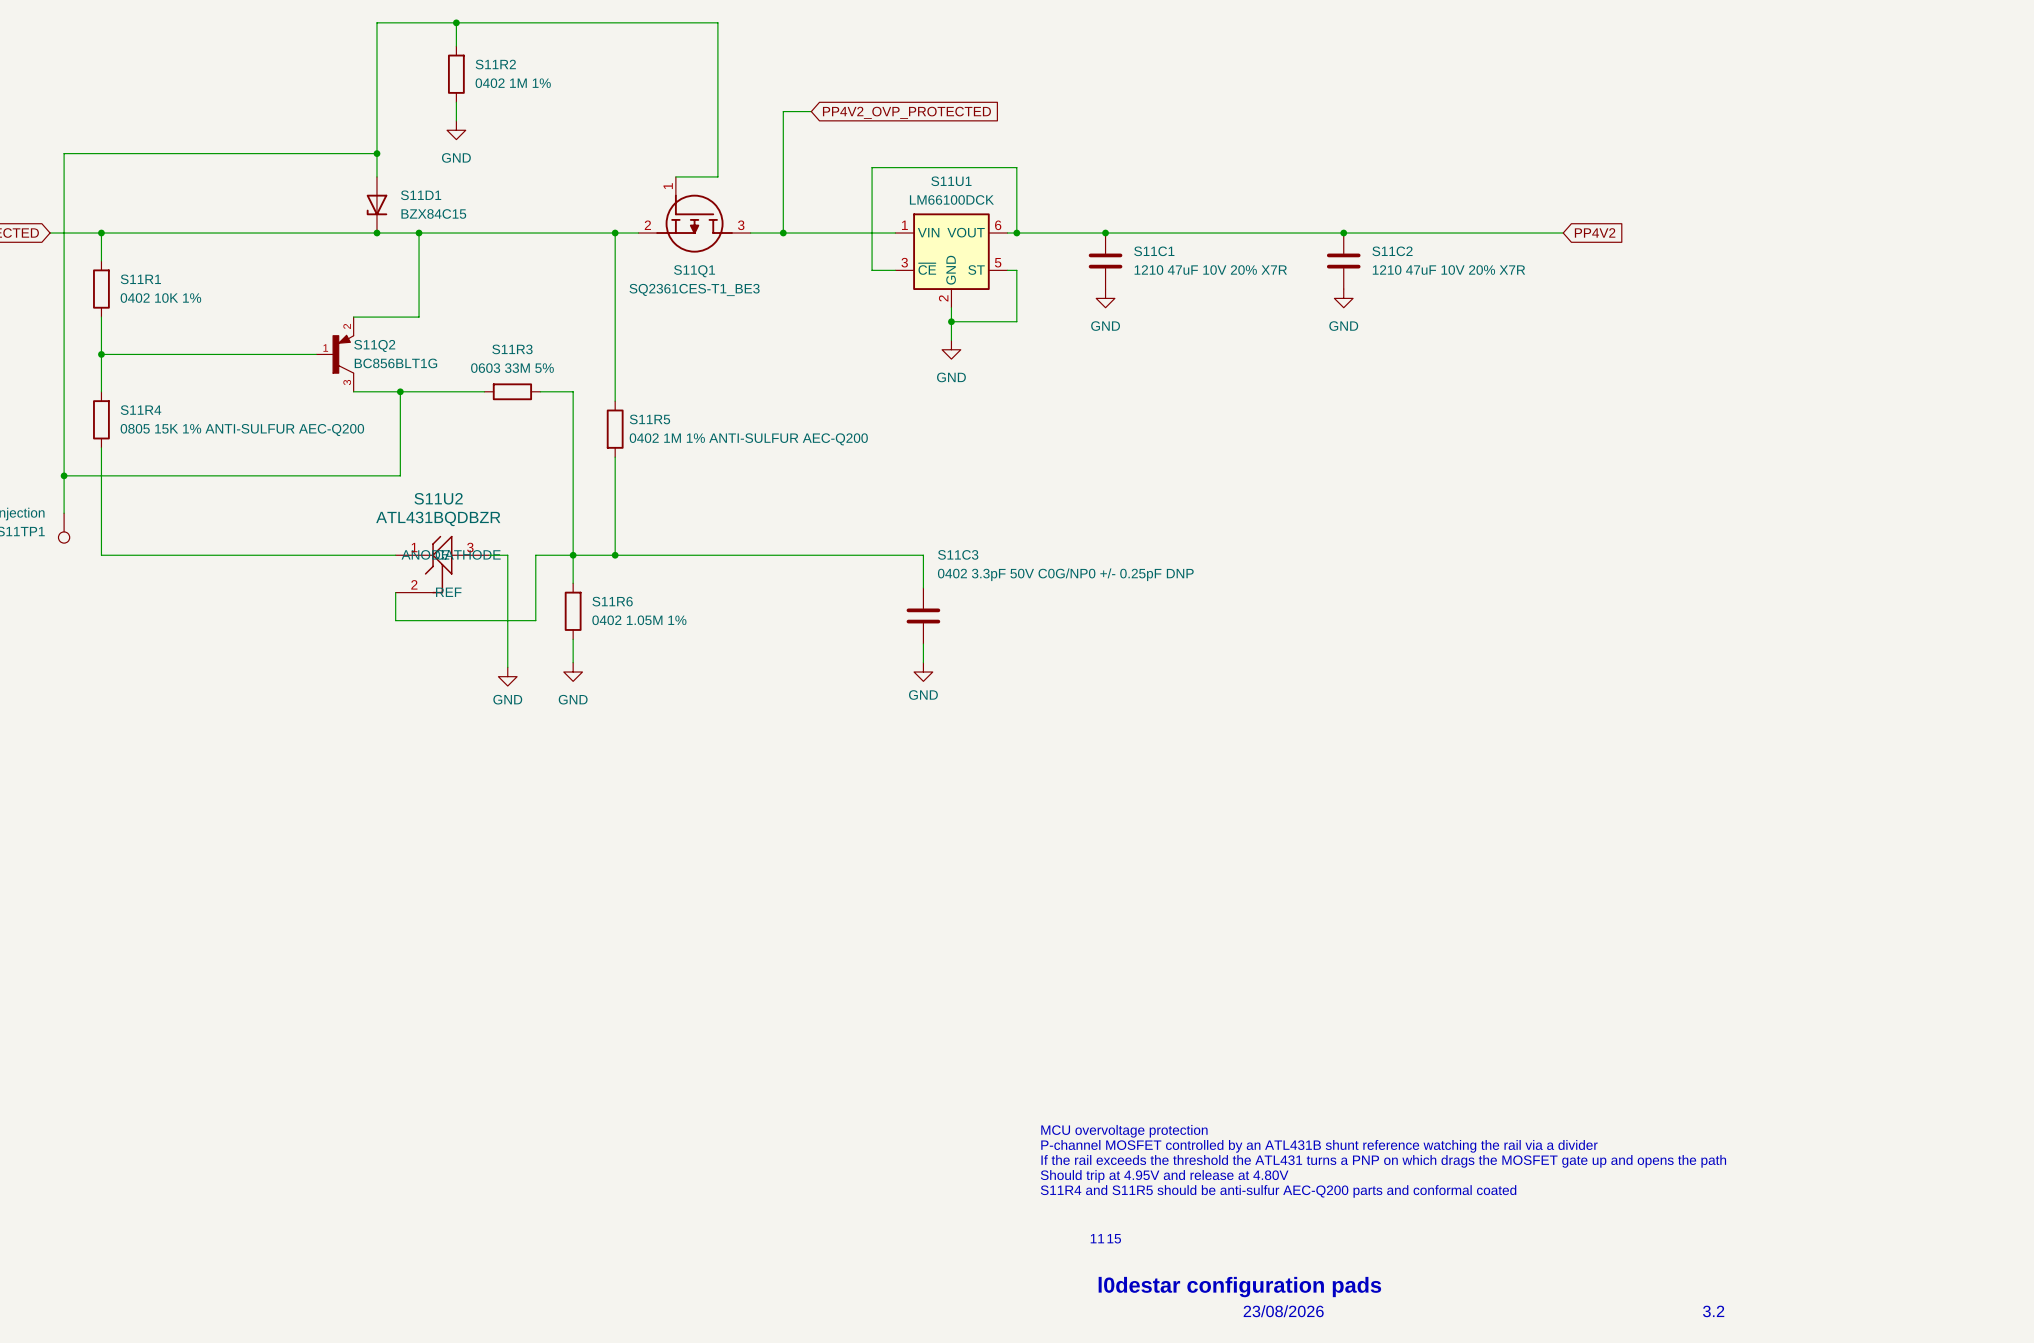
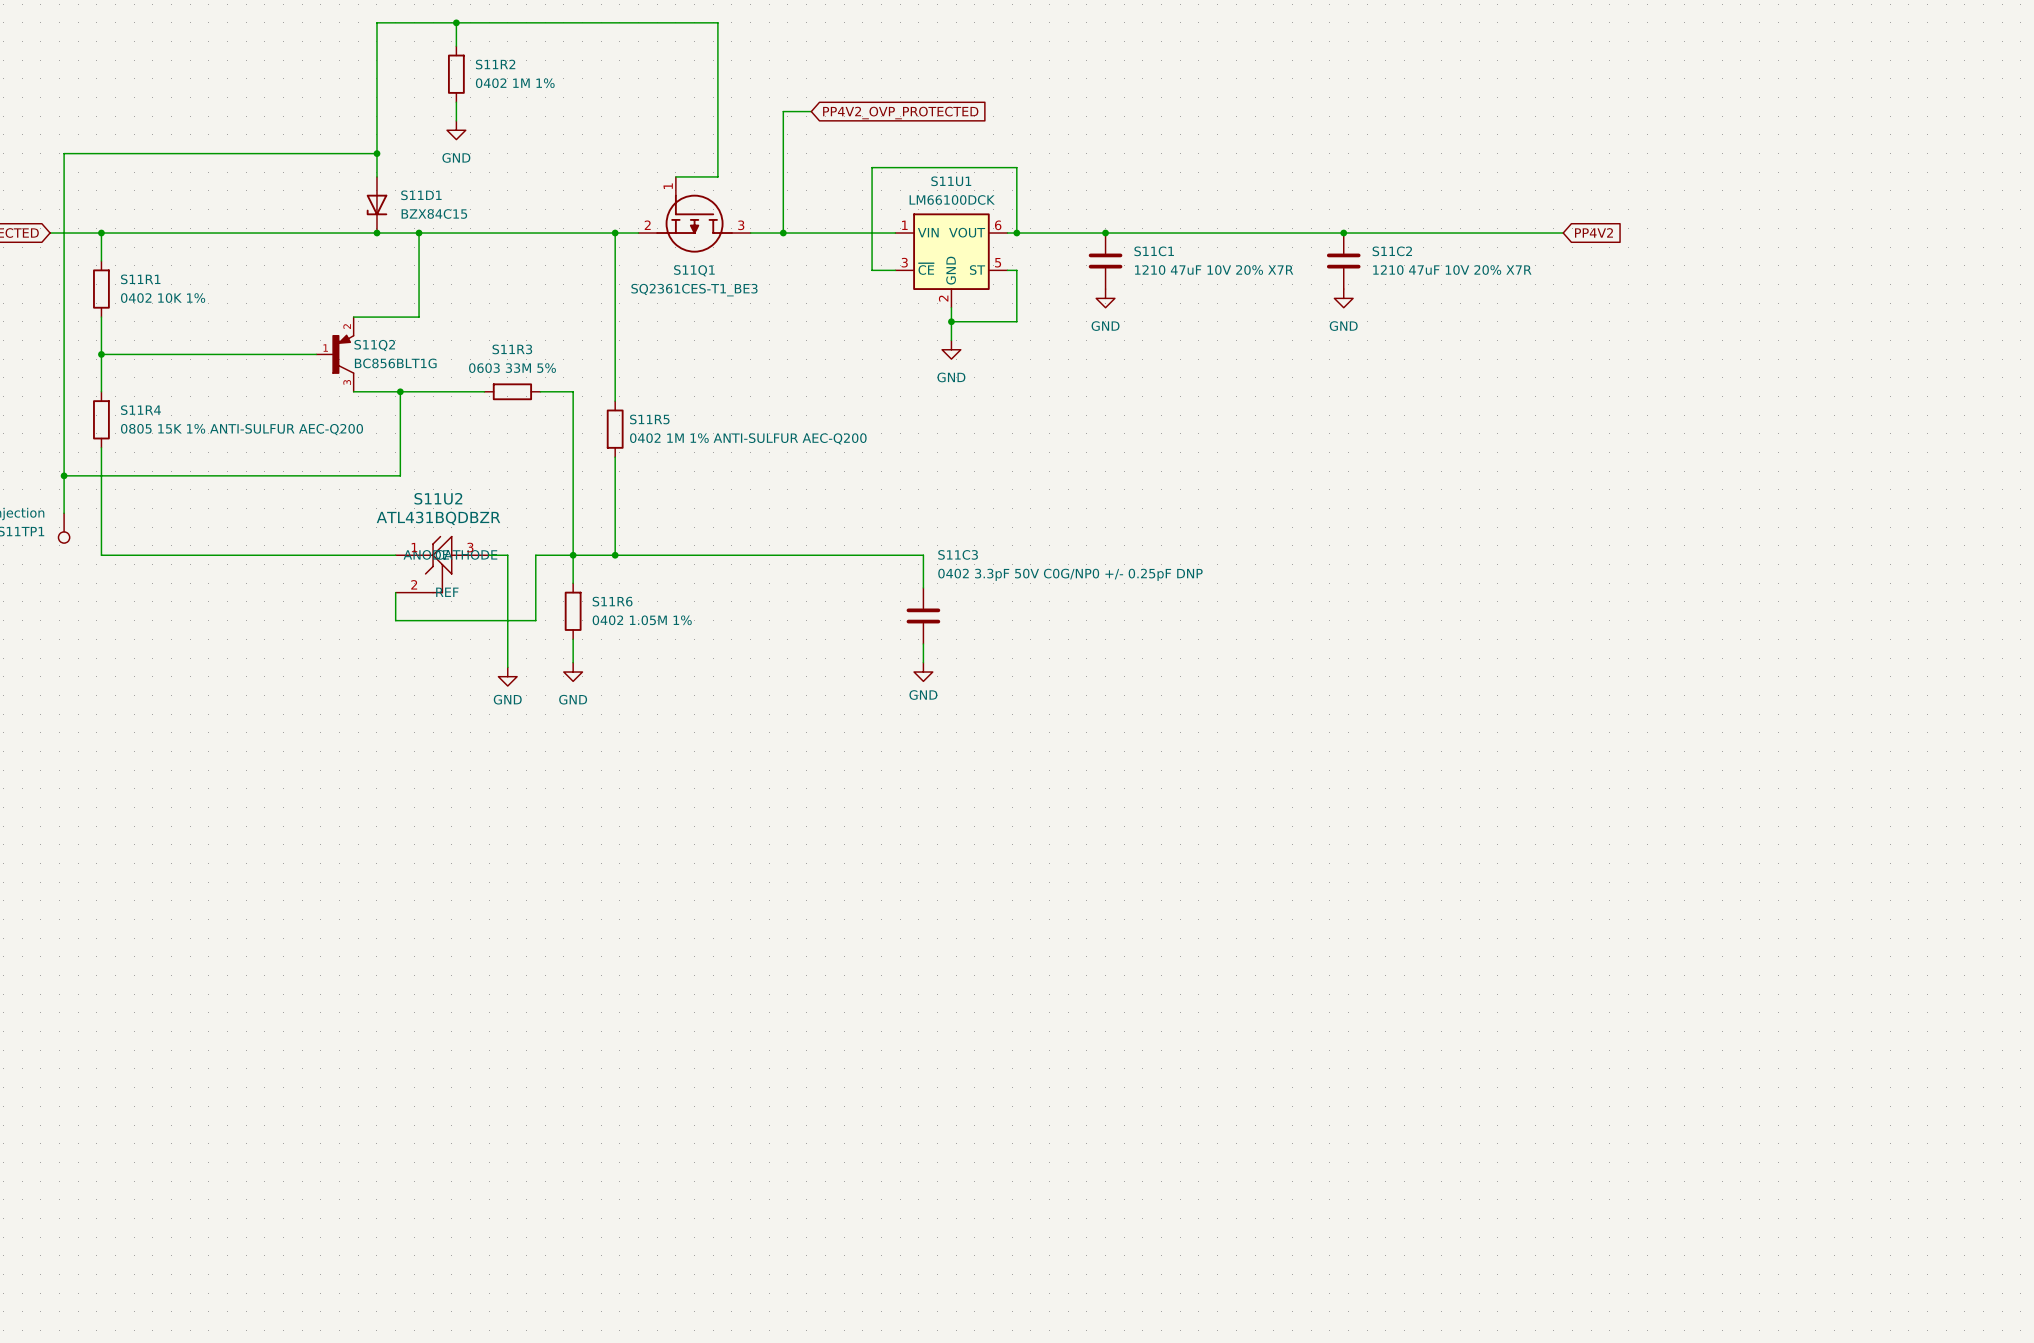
text: MCU overvoltage protection (1124, 1131) -> none
text: P-channel MOSFET controlled by an ATL431B shunt reference watching the rail via a divider (1319, 1146) -> none
text: If the rail exceeds the threshold the ATL431 turns a PNP on which drags the MOSFET gate up and opens the path (1383, 1161) -> none
text: Should trip at 4.95V and release at 4.80V (1164, 1176) -> none
text: S11R4 and S11R5 should be anti-sulfur AEC-Q200 parts and conformal coated (1278, 1191) -> none
text: 11 (1097, 1238) -> none
text: 15 (1114, 1238) -> none
text: l0destar configuration pads (1239, 1287) -> none
text: 23/08/2026 (1283, 1311) -> none
text: 3.2 (1713, 1311) -> none

